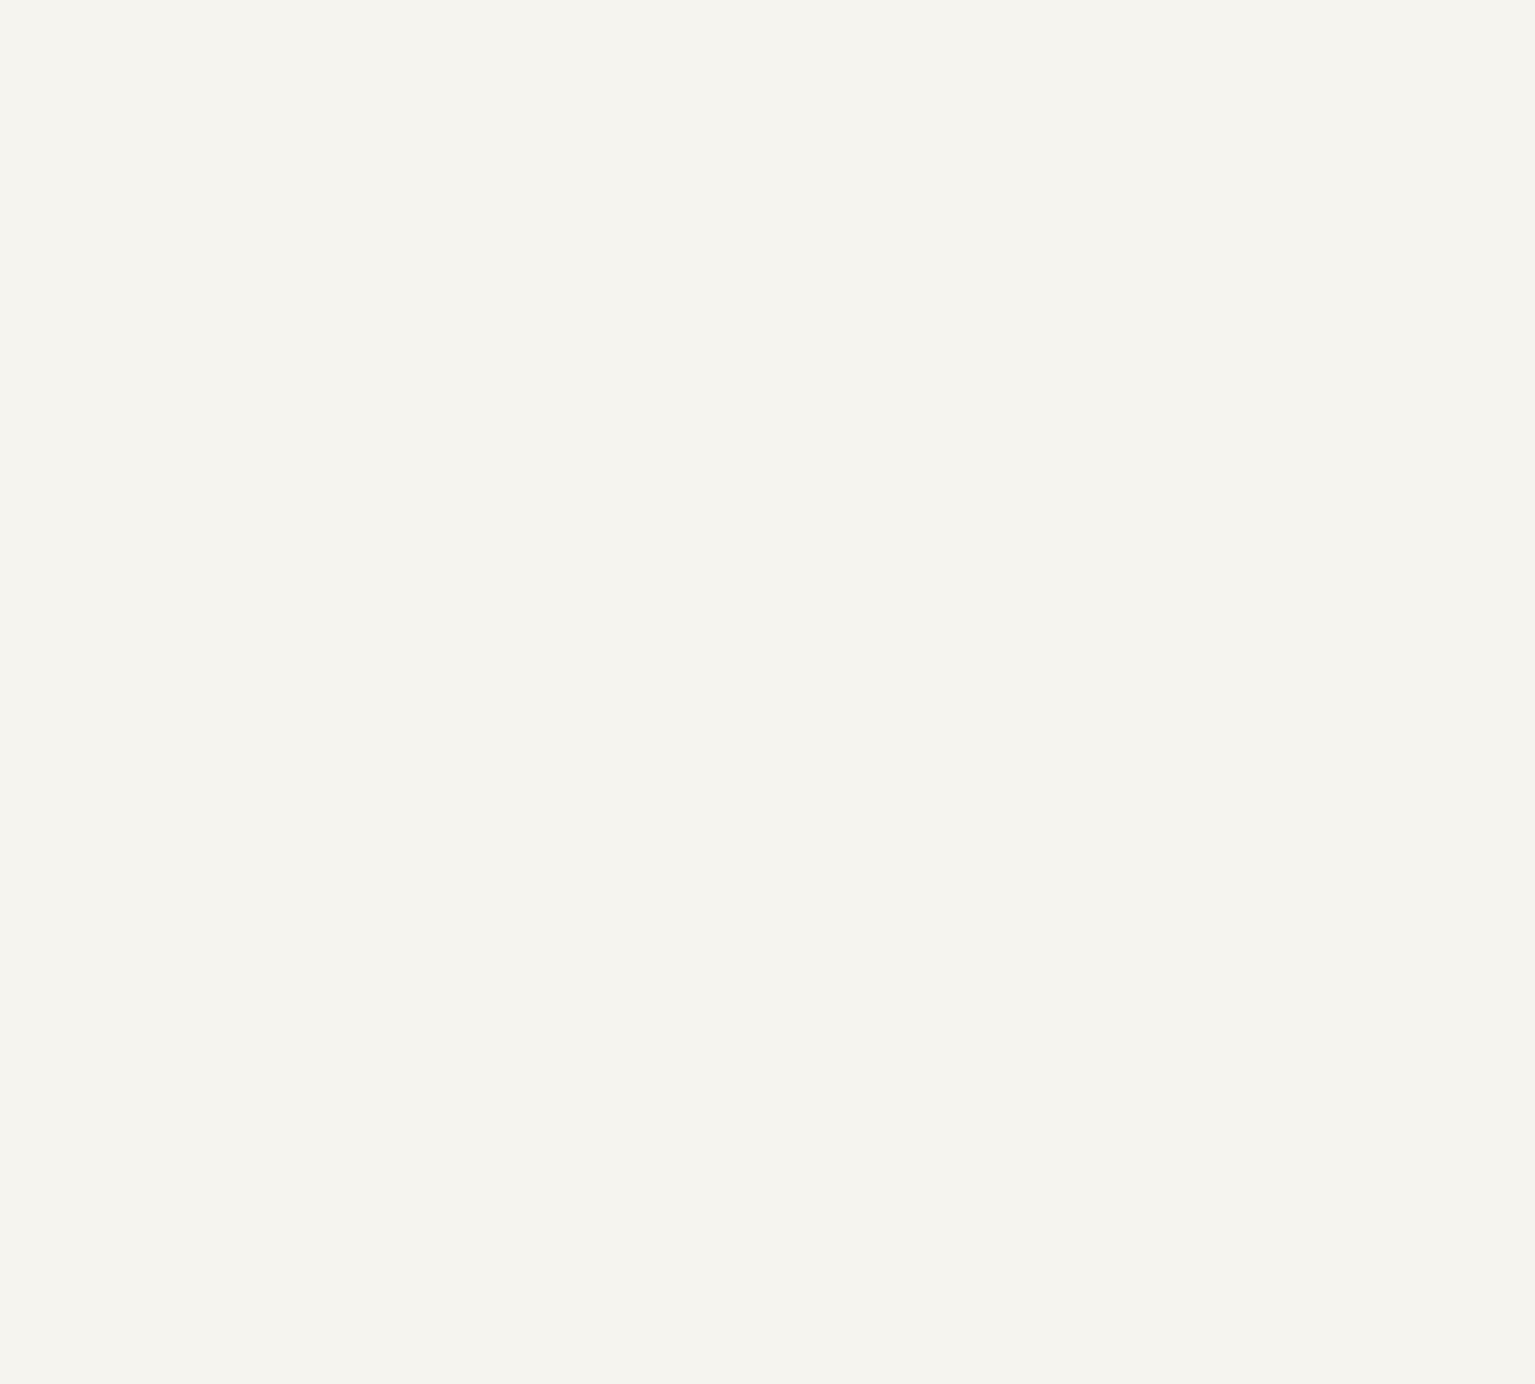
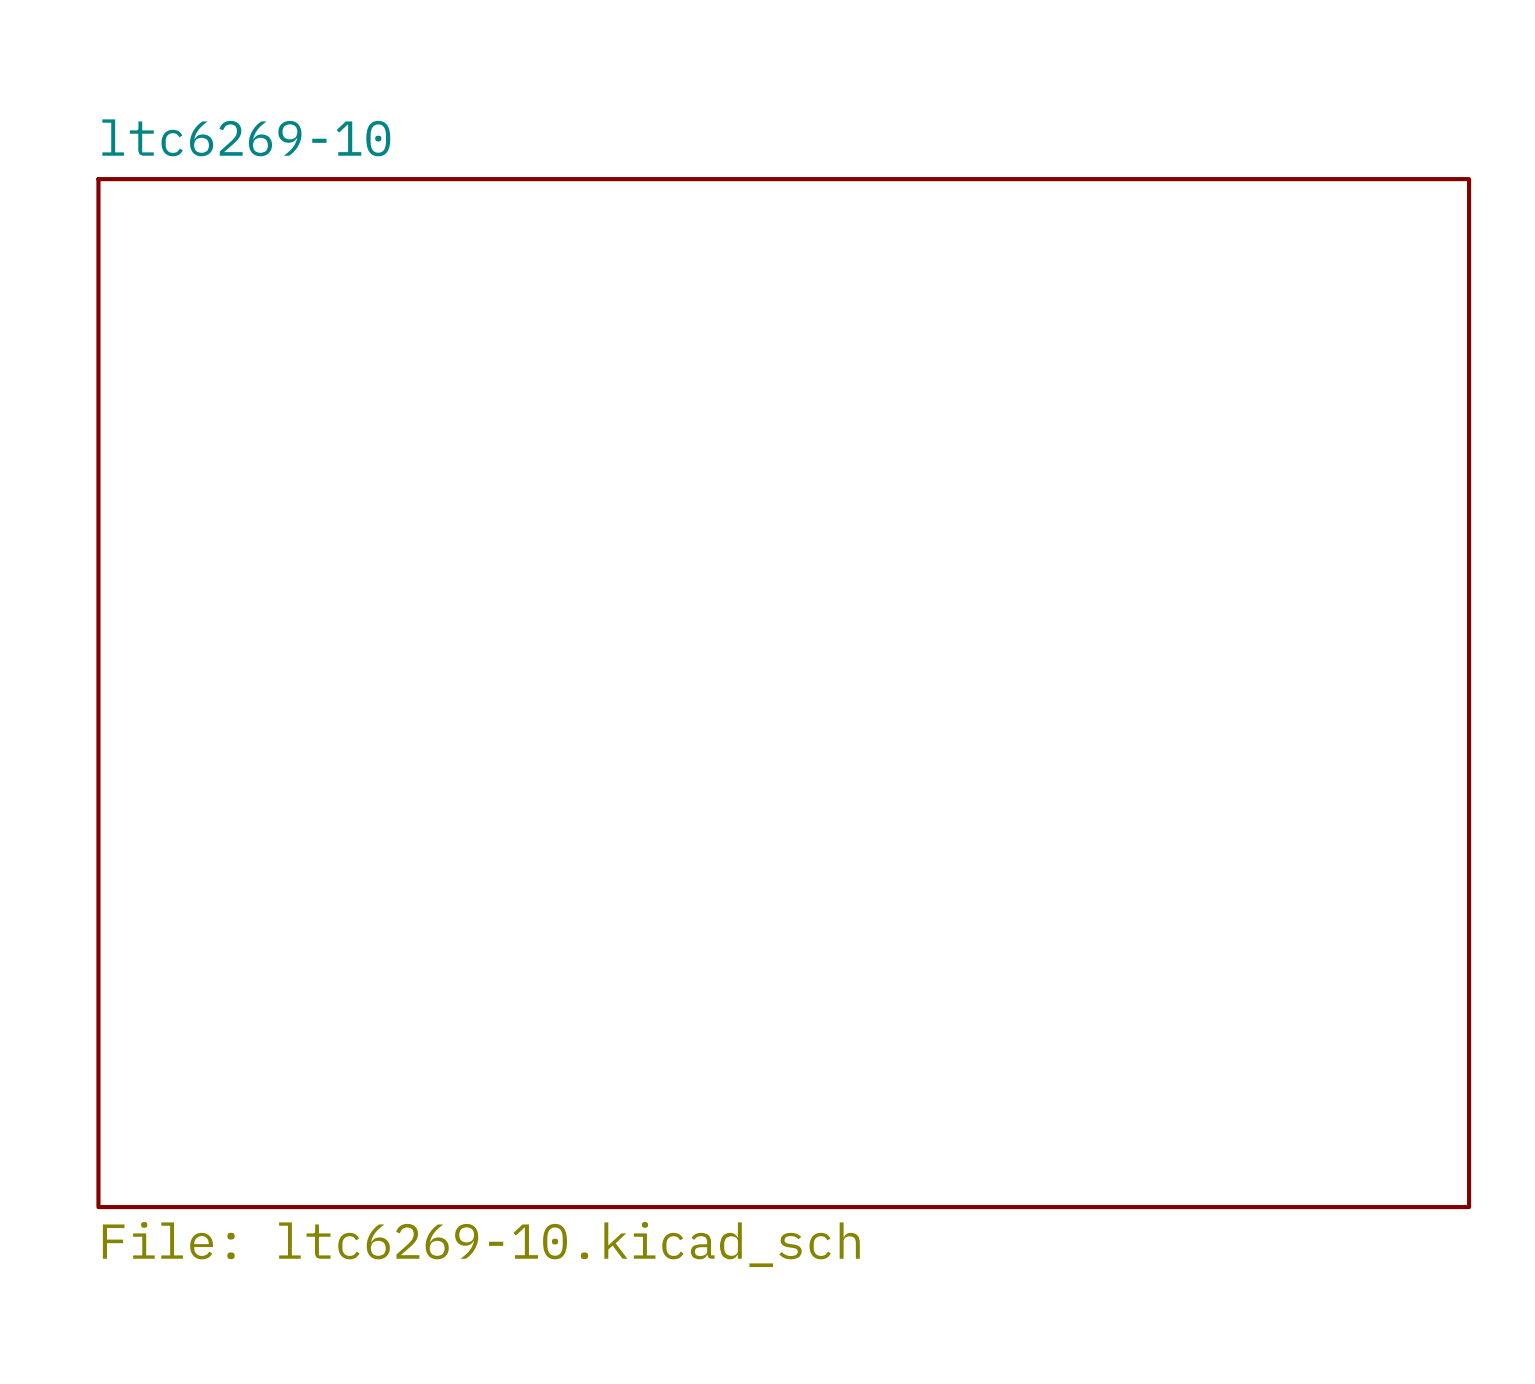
sheet ltc6269-10: none -> File: ltc6269-10.kicad_sch (783, 693)

